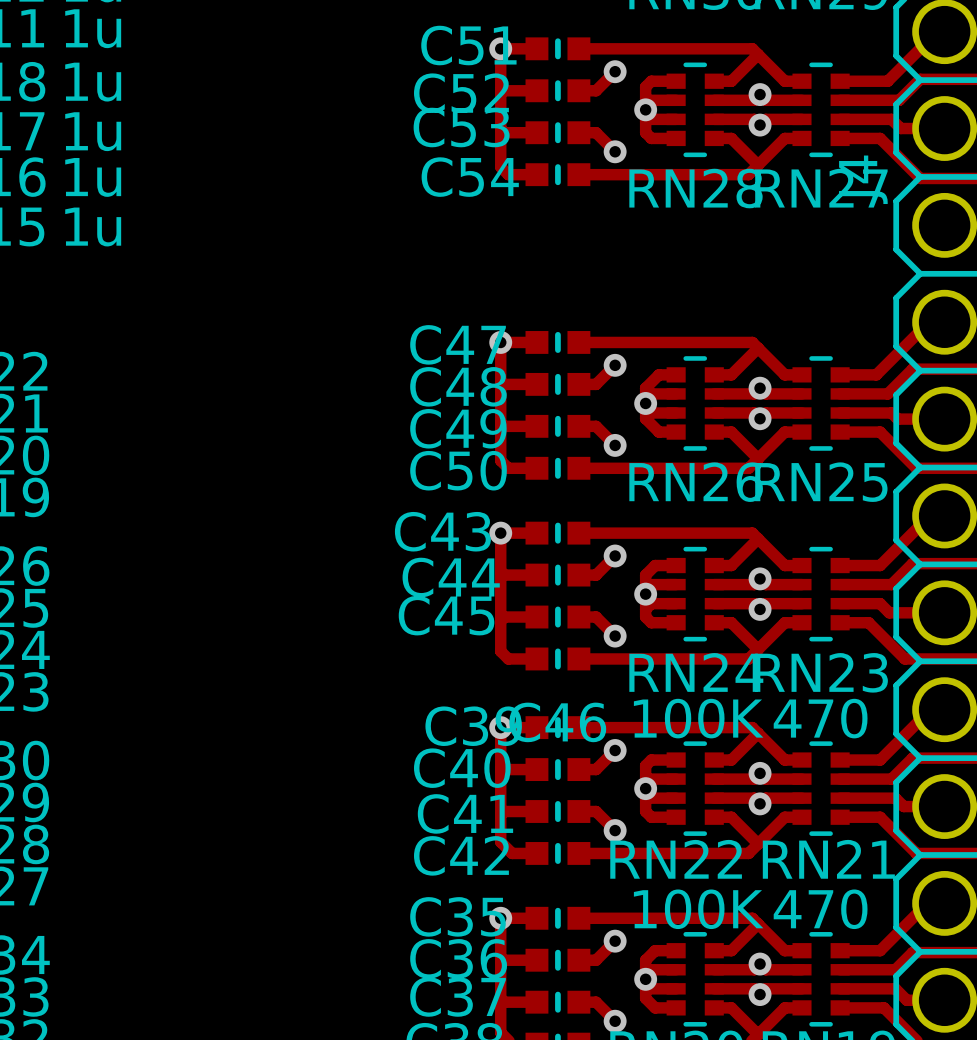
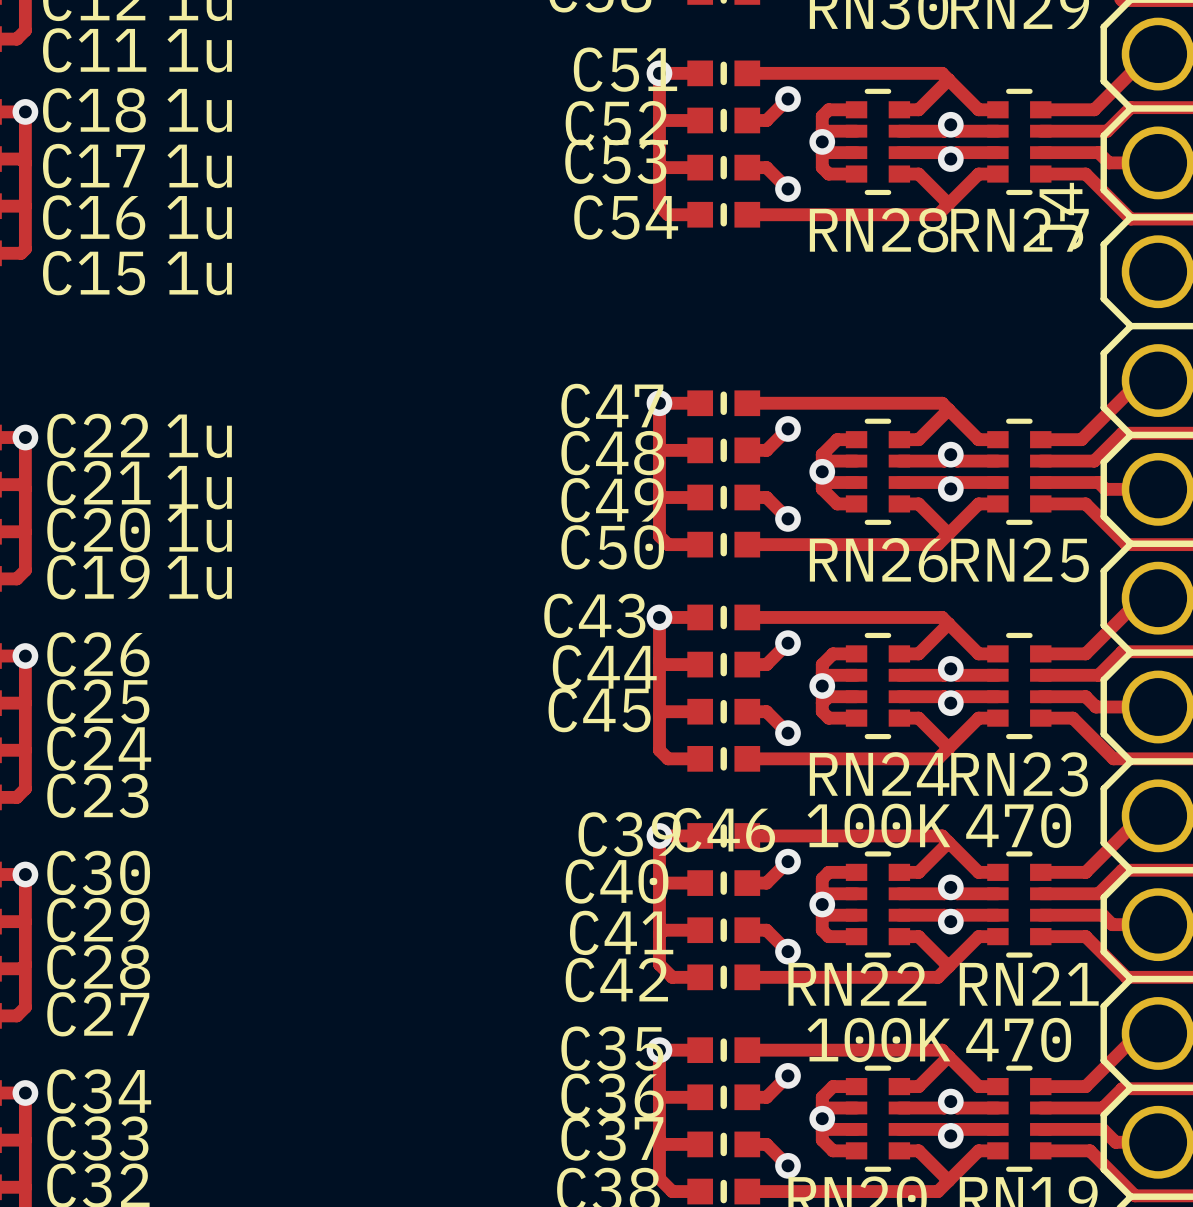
C22 value: none -> 1u (199, 436)
C21 value: none -> 1u (199, 487)
C20 value: none -> 1u (199, 530)
C19 value: none -> 1u (199, 577)

